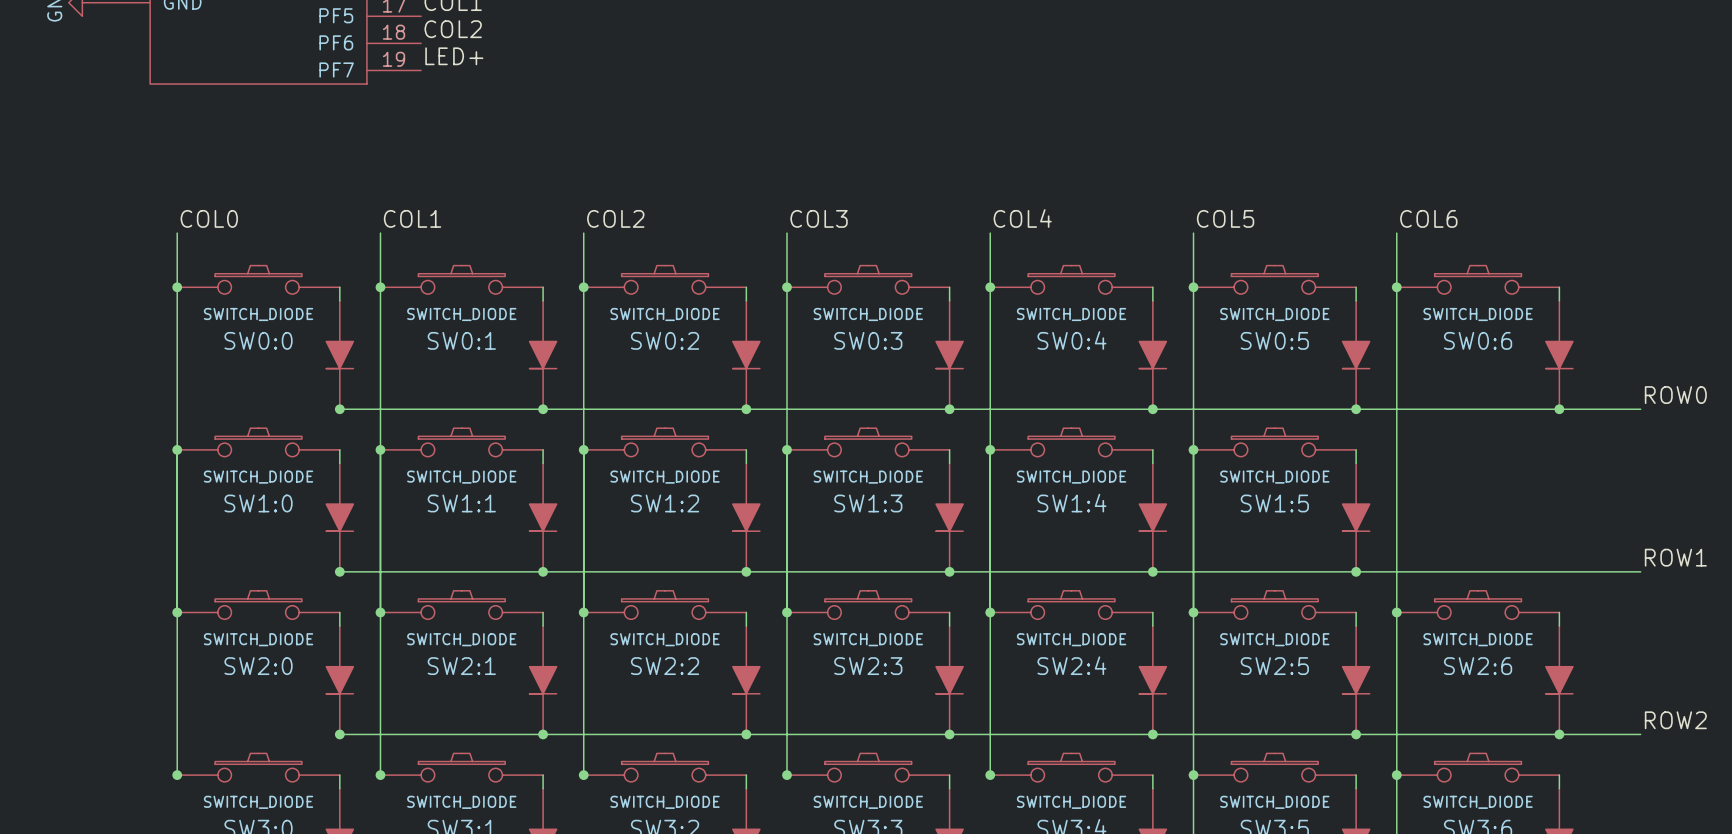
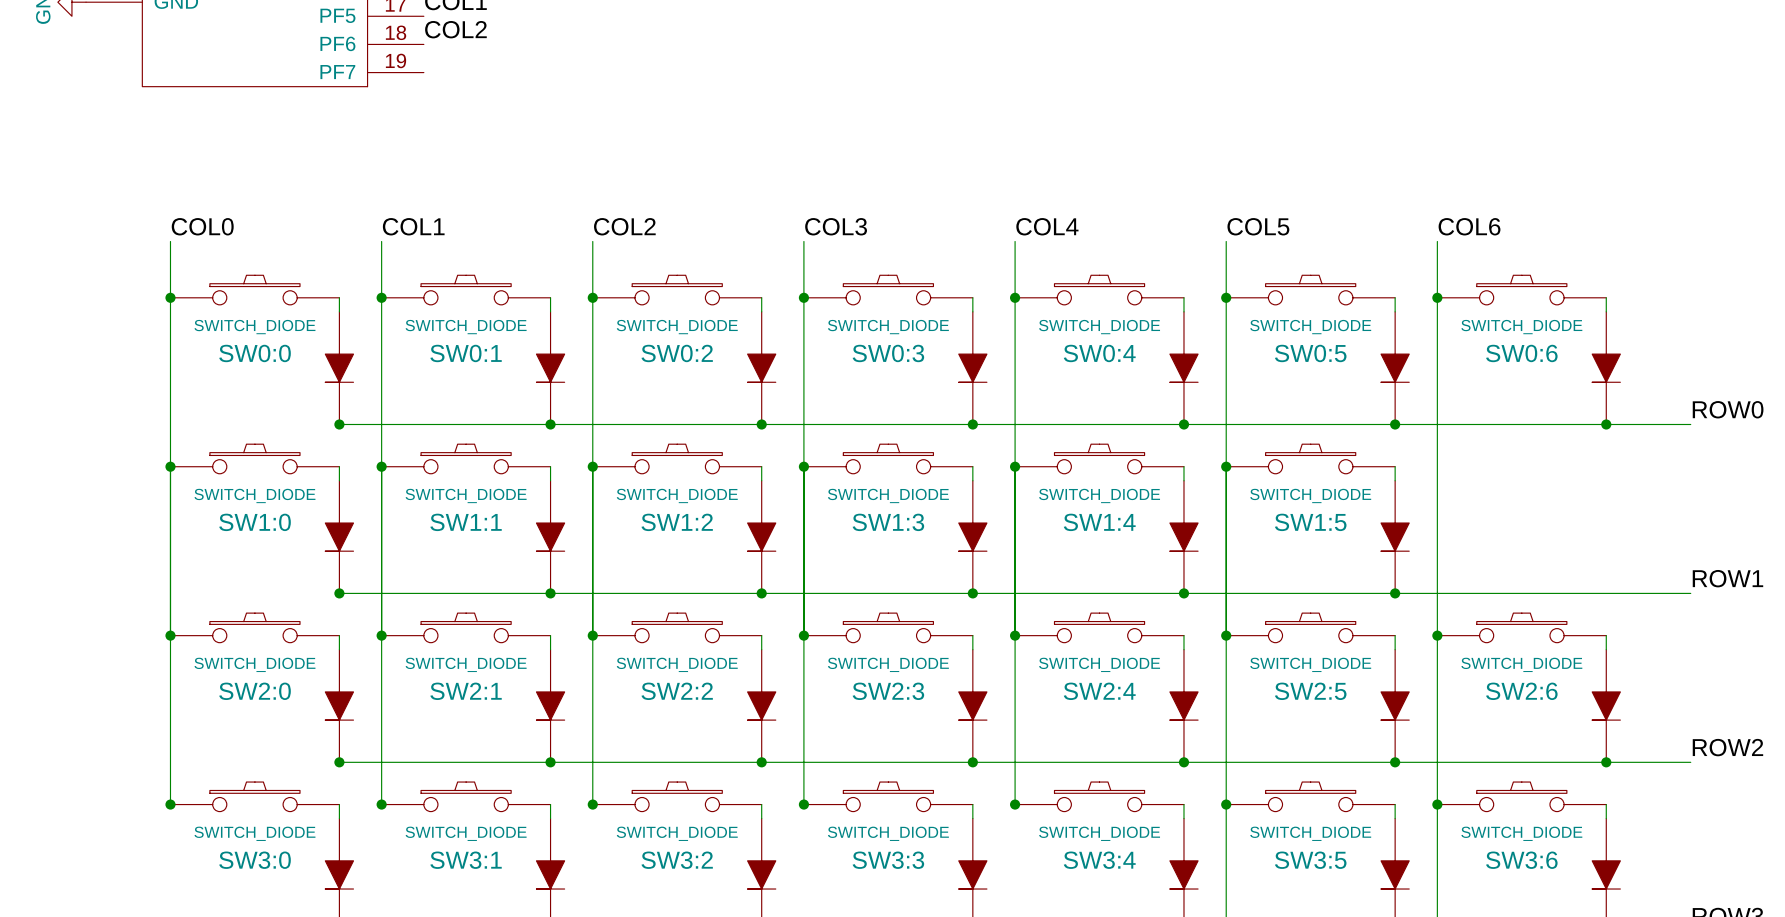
label: LED+ (454, 56) -> none

